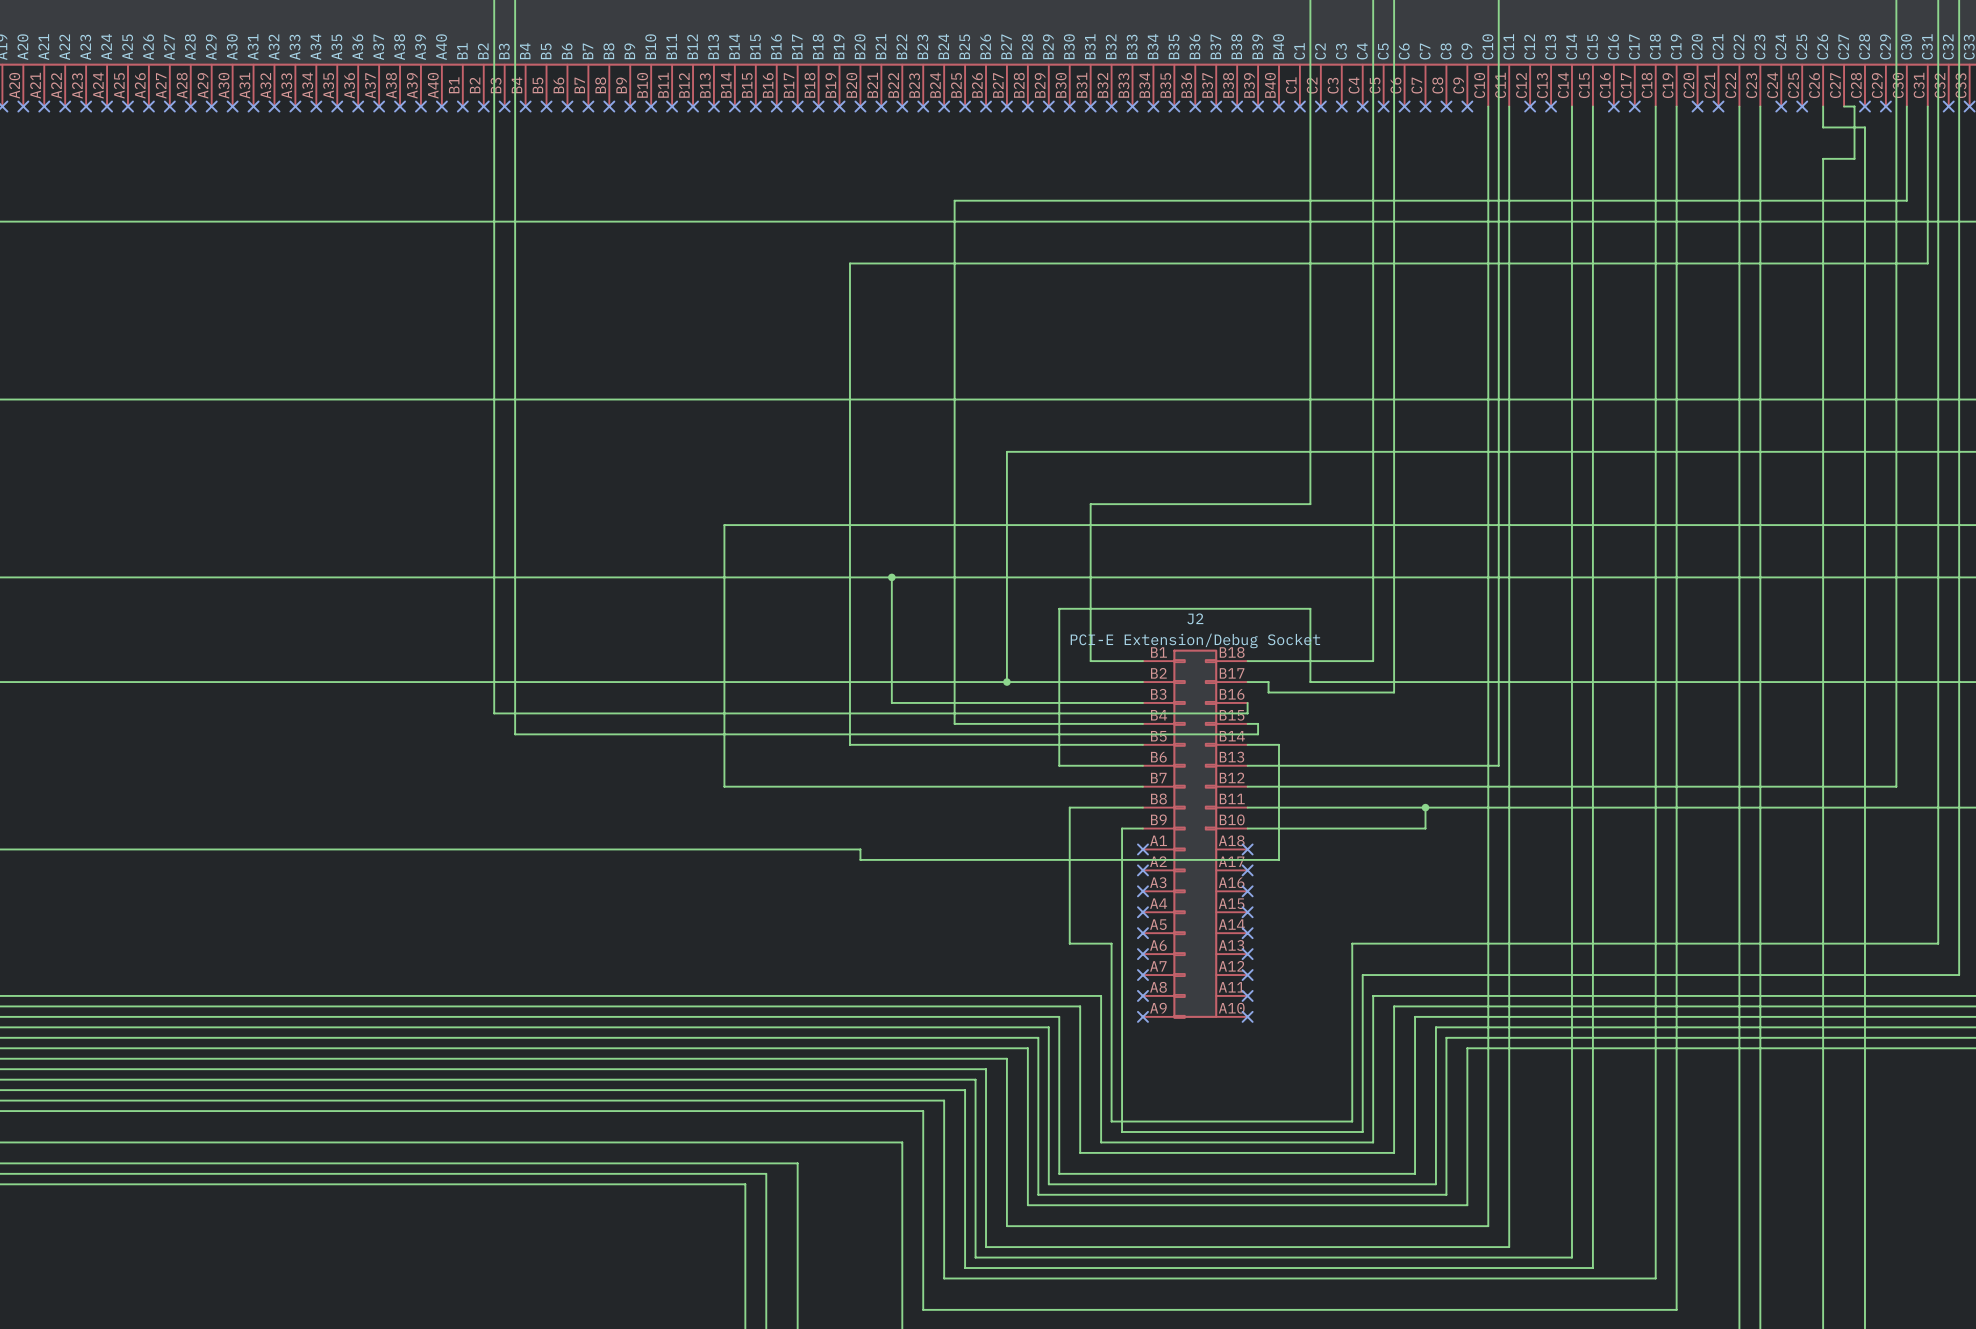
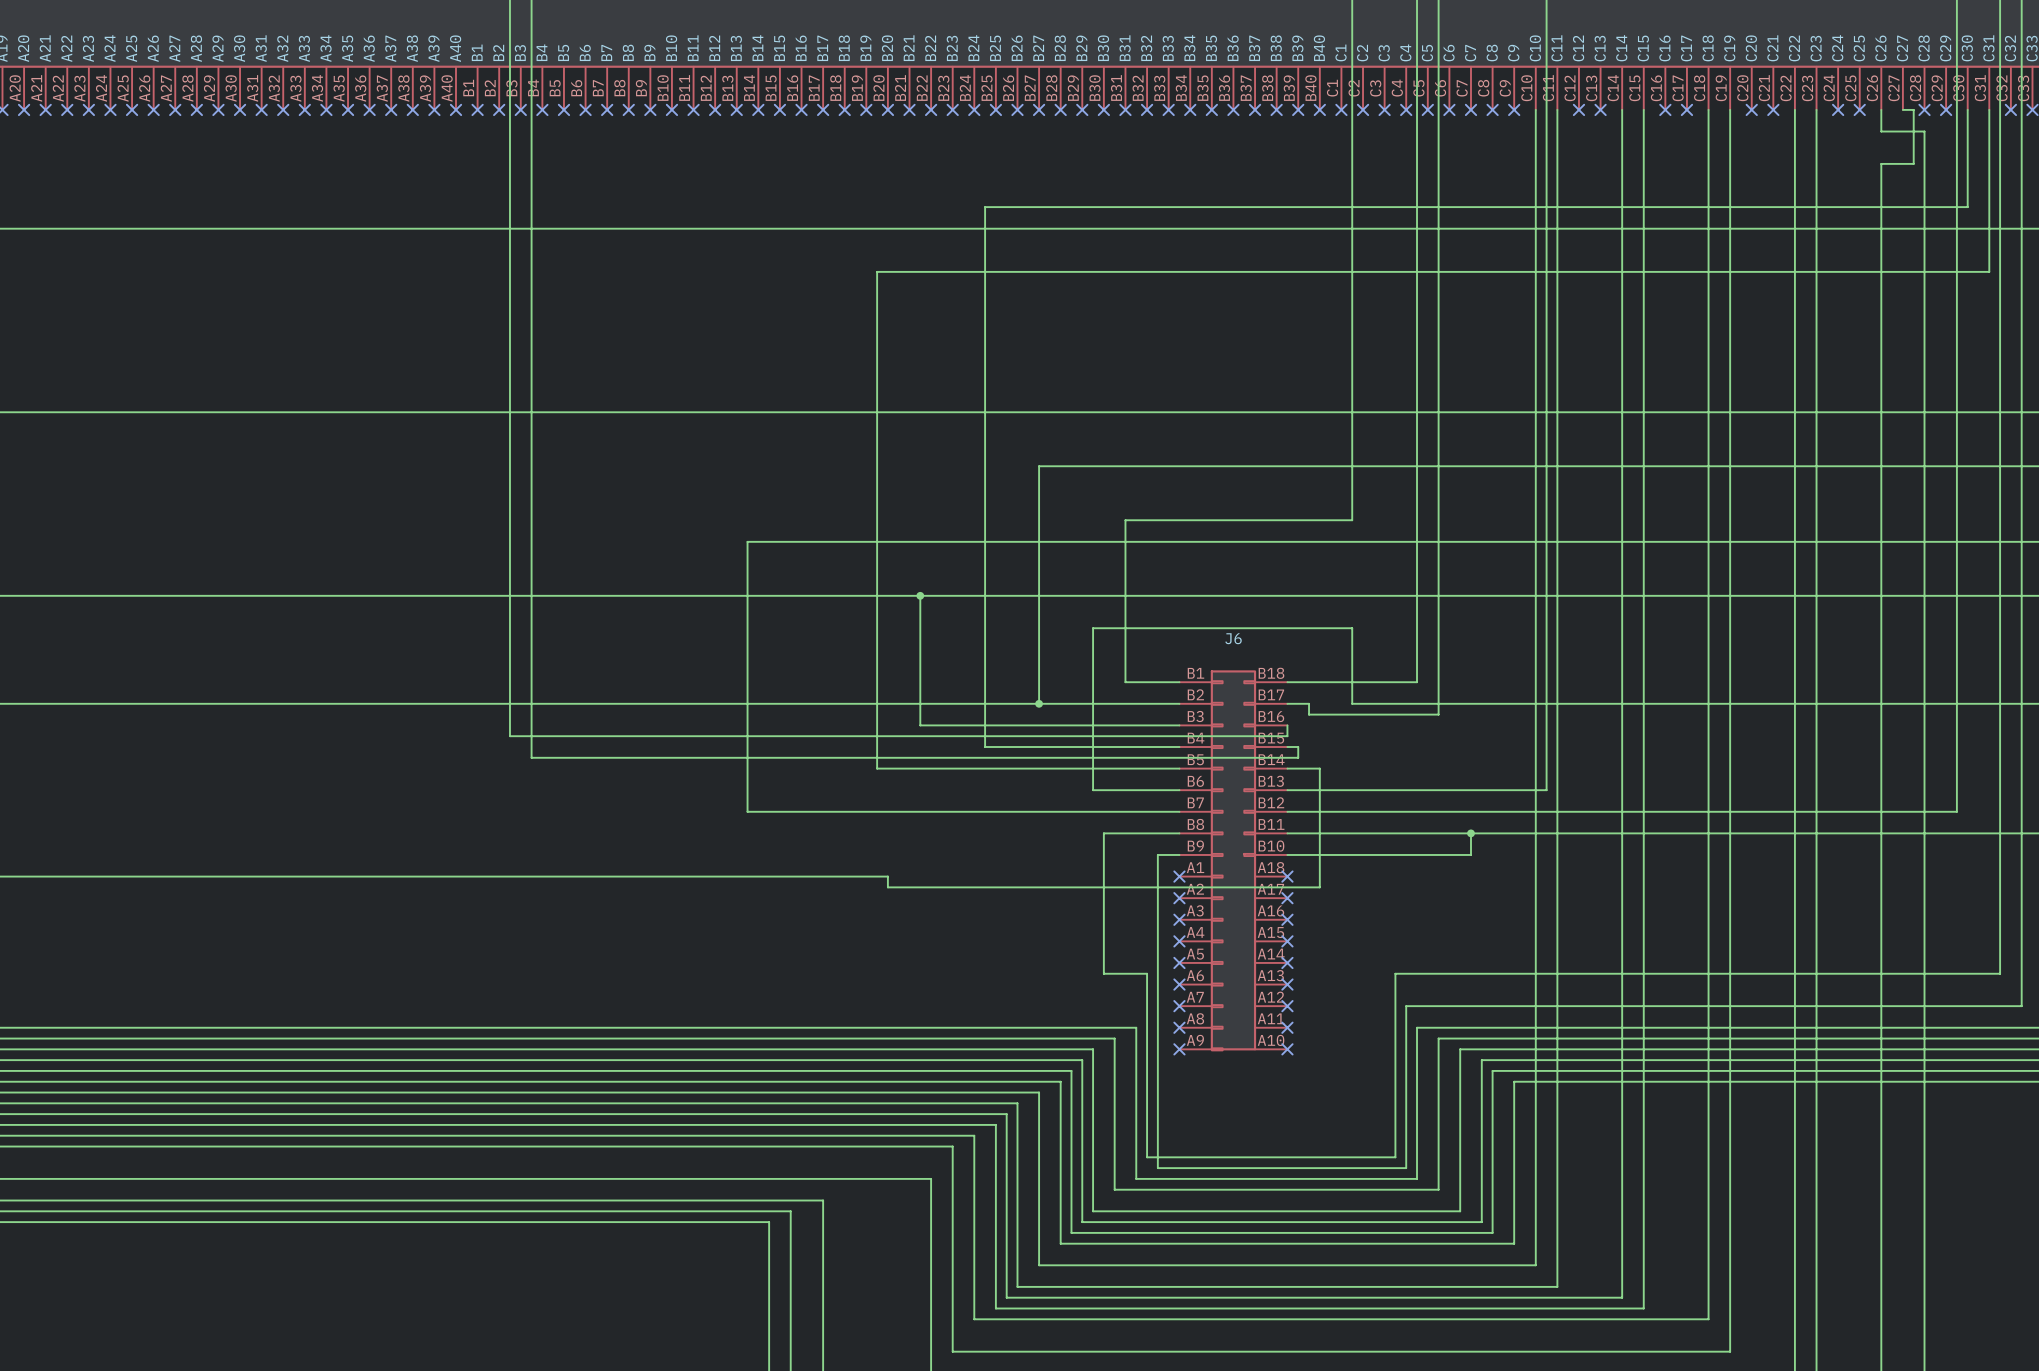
J2 name: J2 (1195, 618) -> J6 (1233, 638)
J2 value: PCI-E Extension/Debug Socket (1195, 640) -> none

